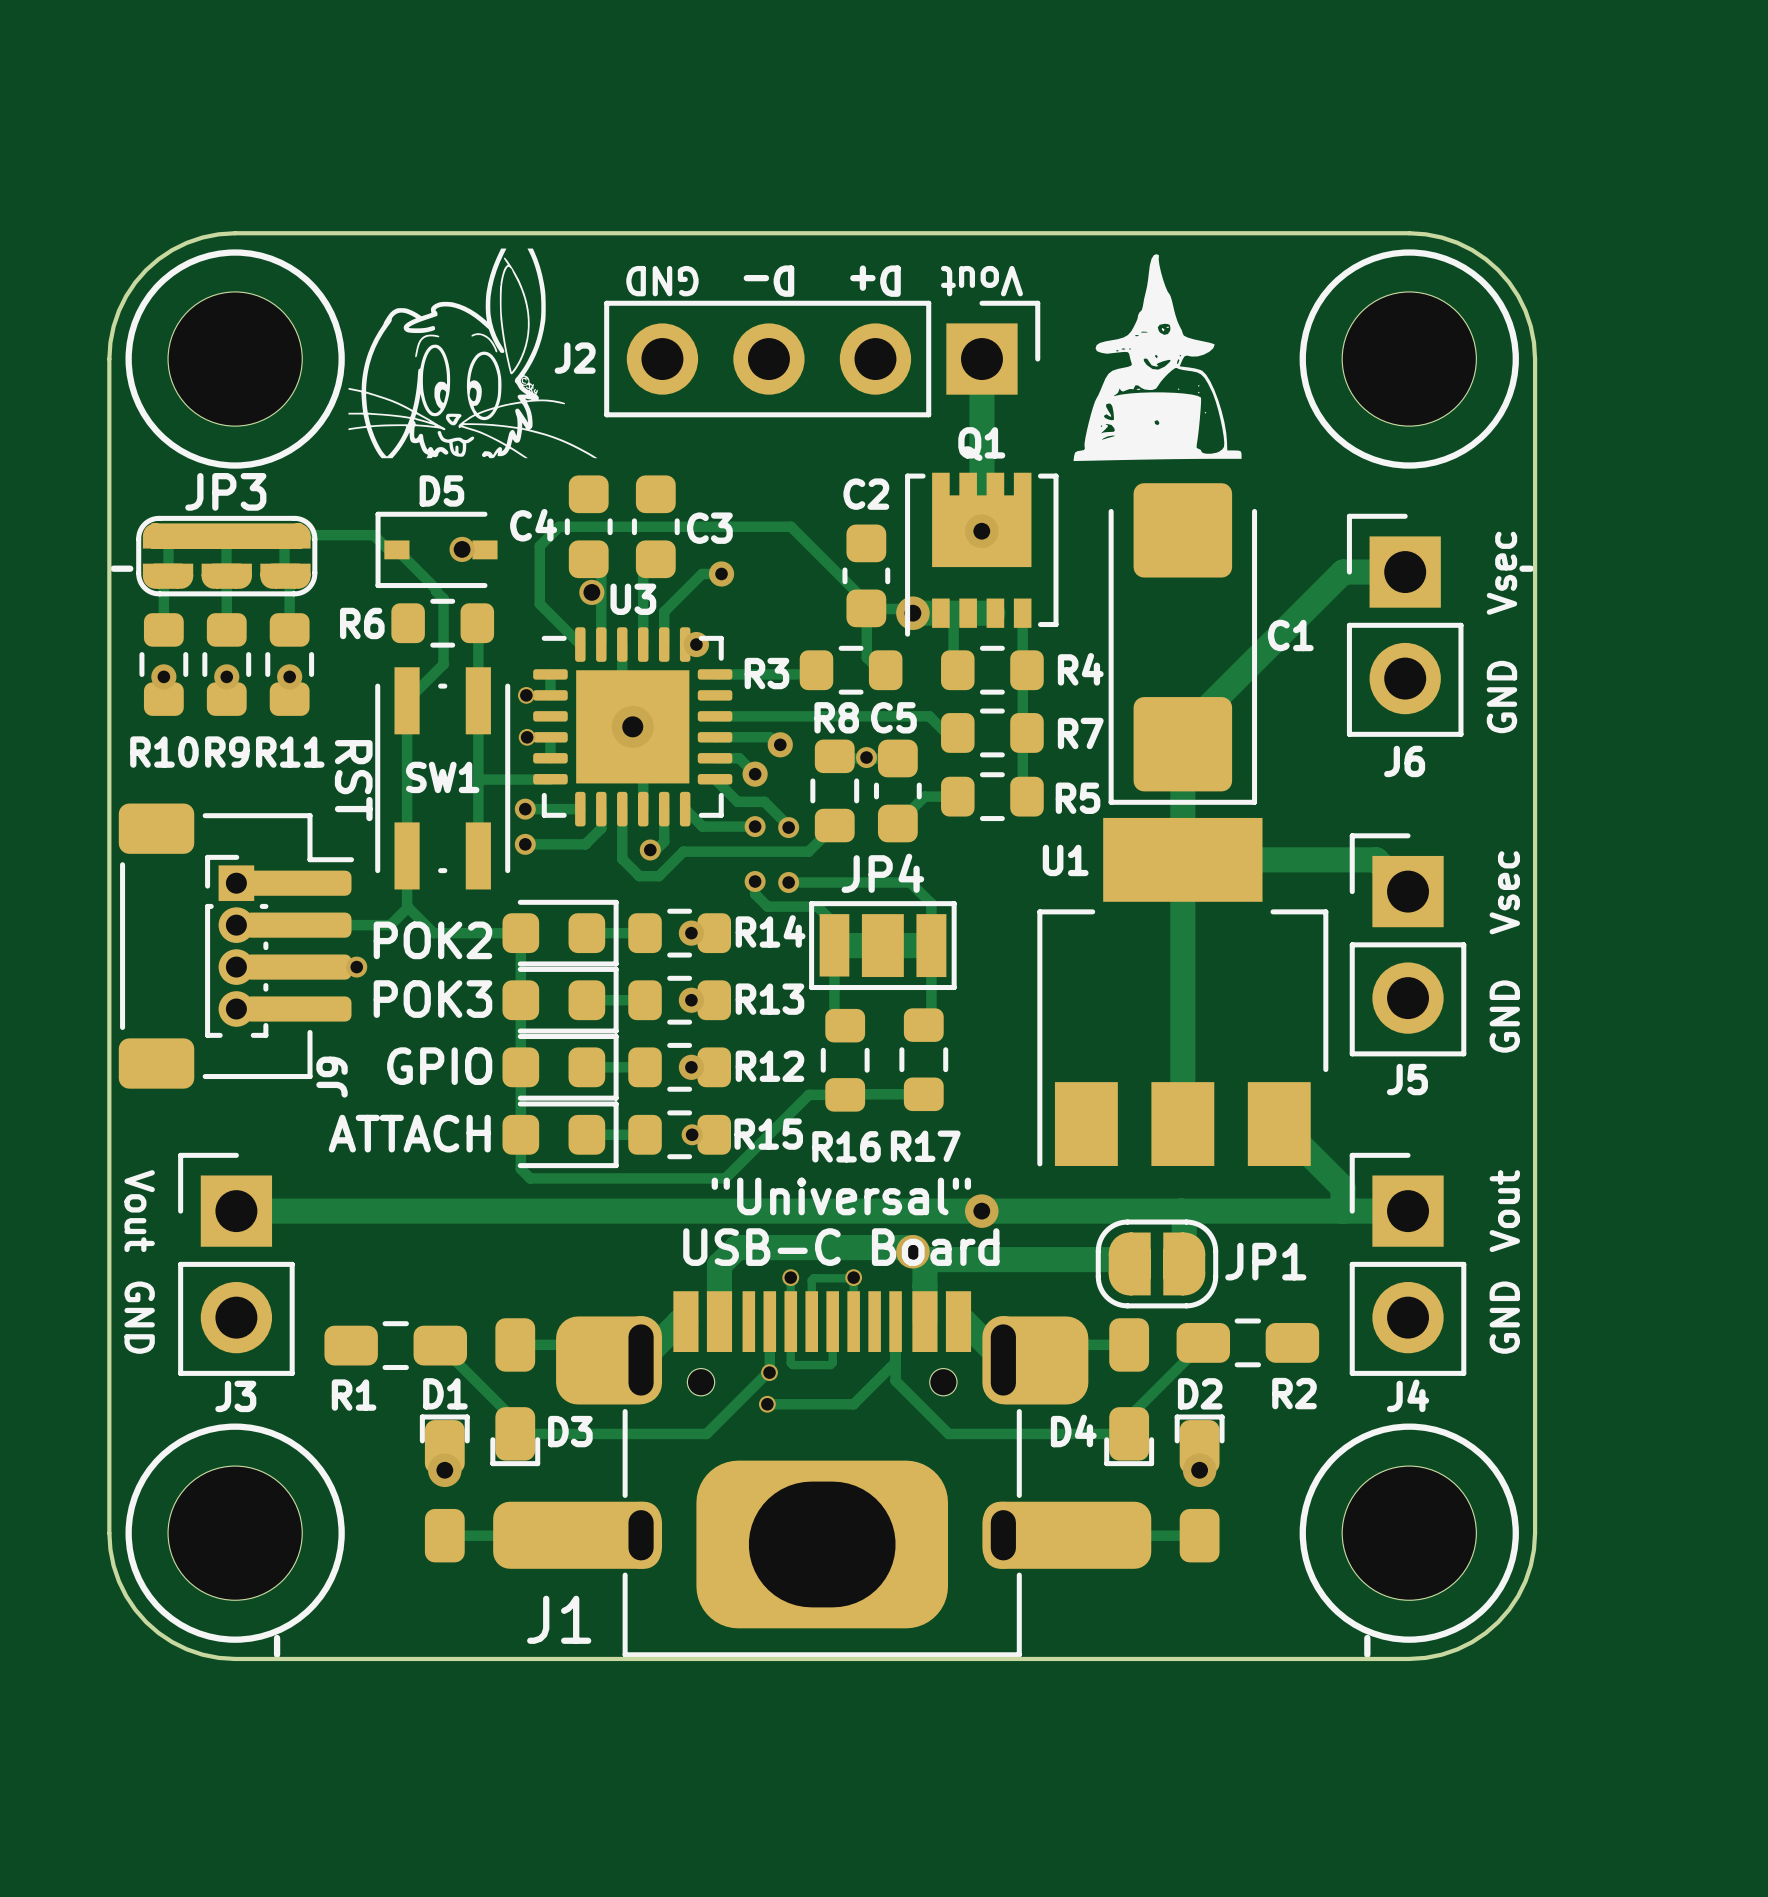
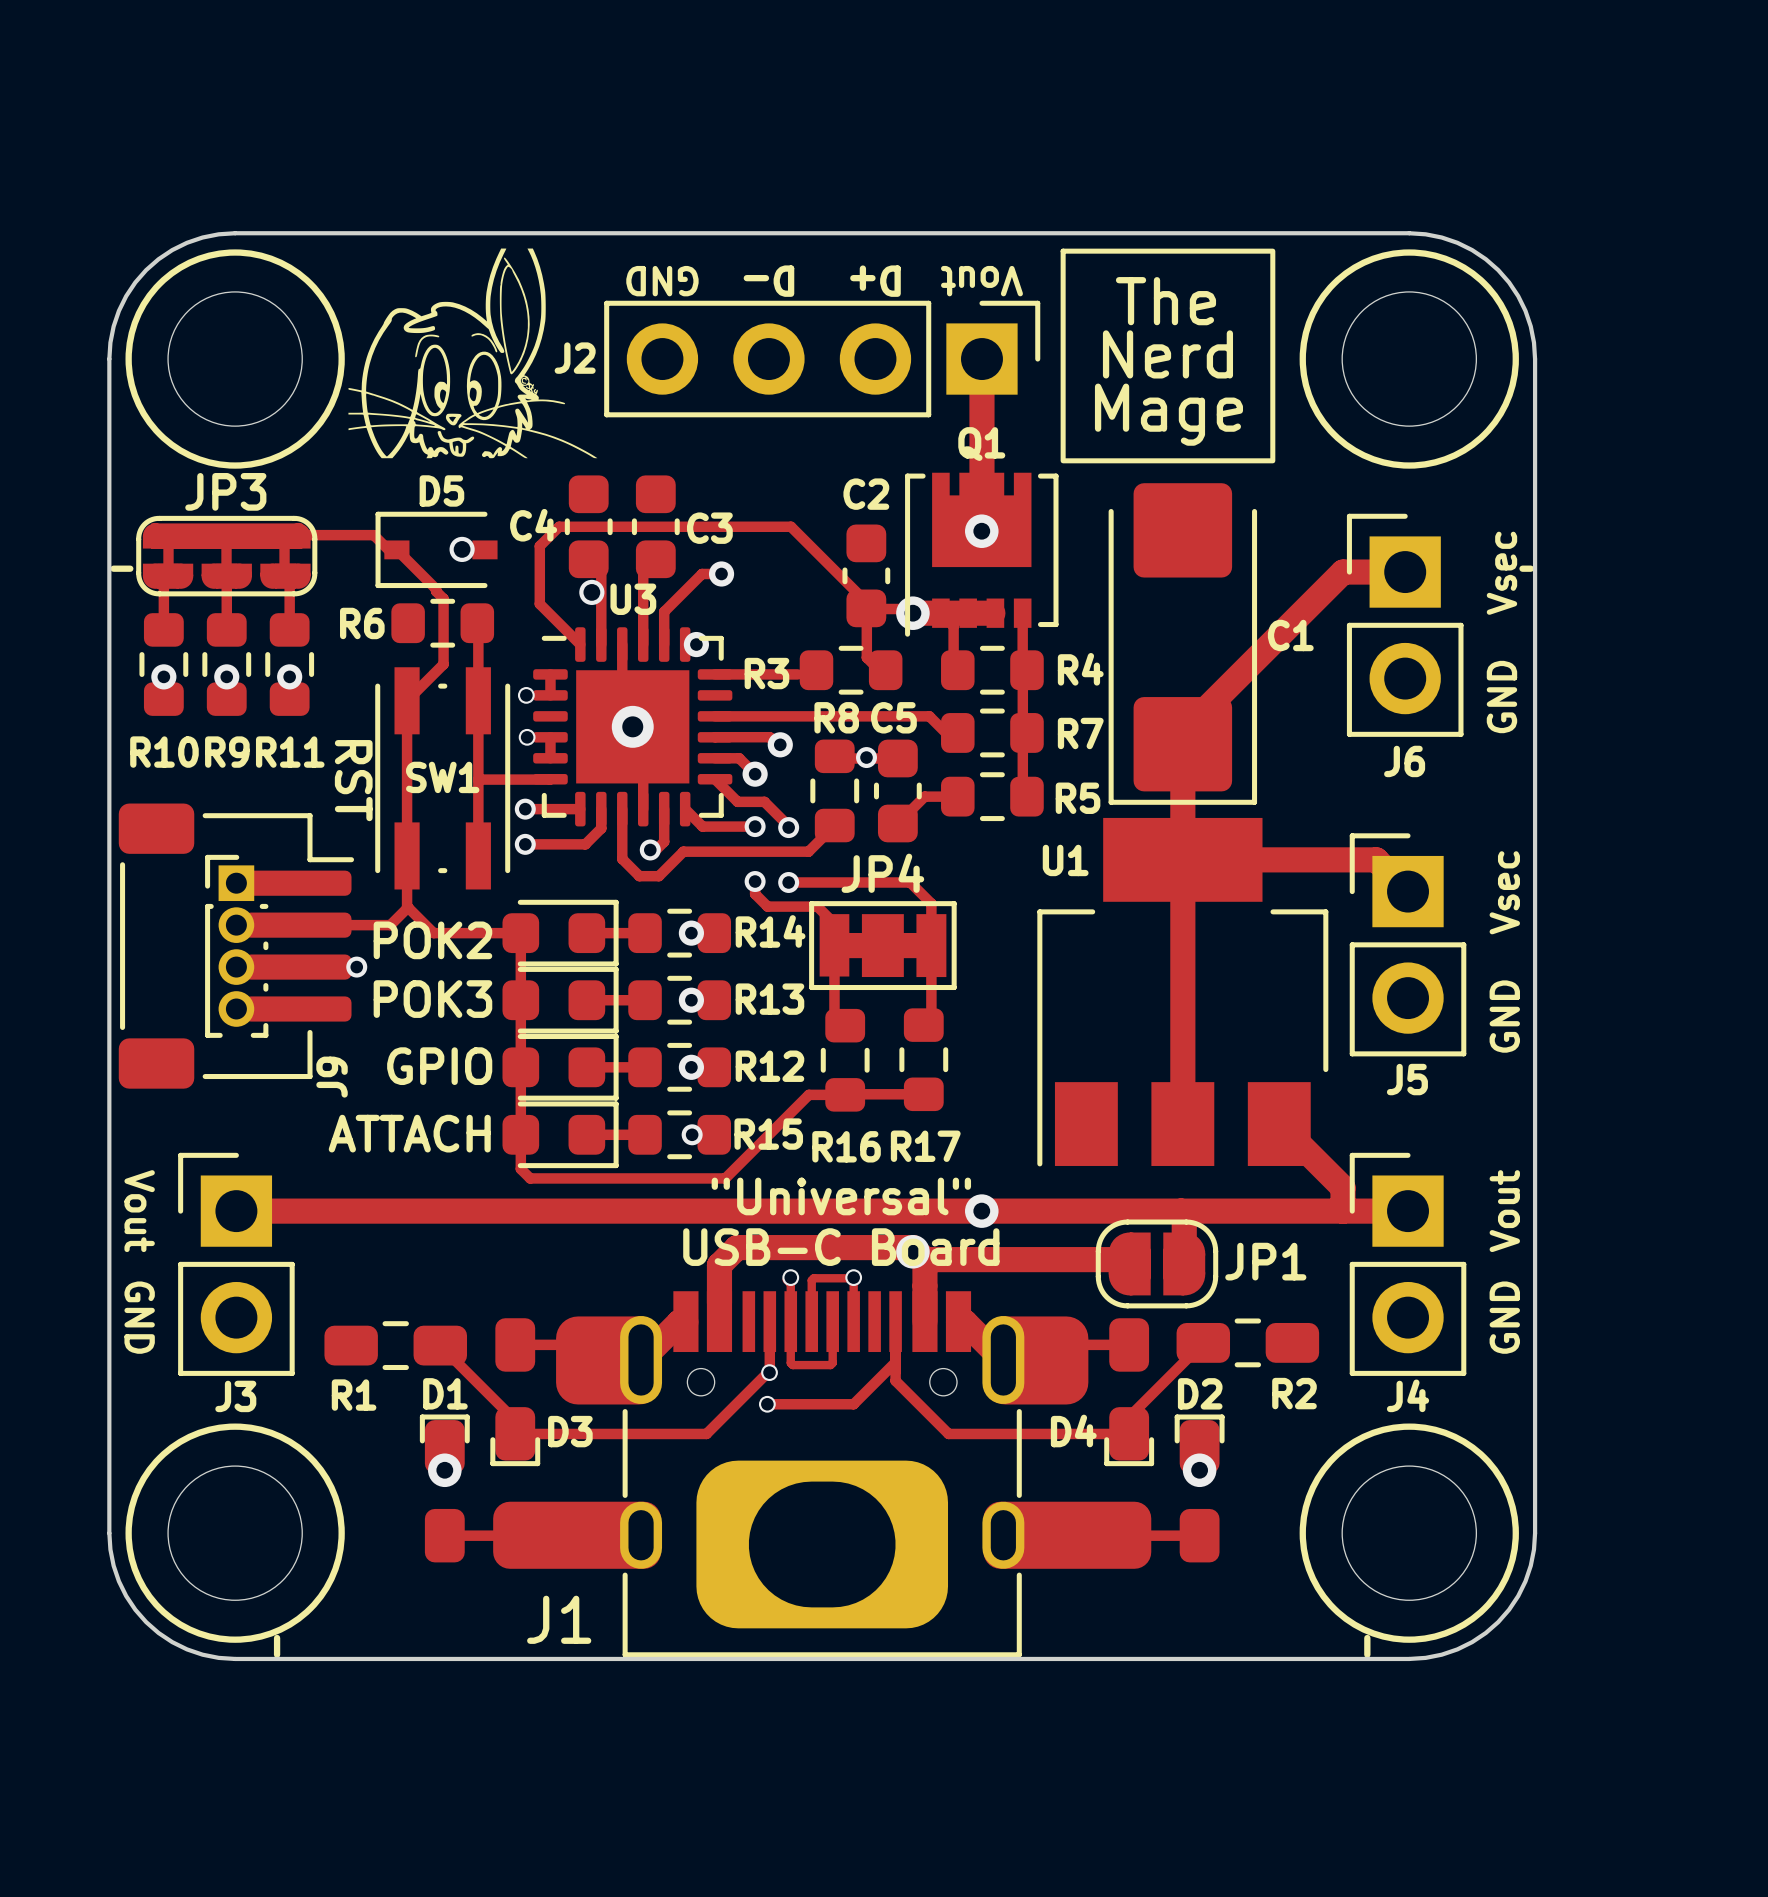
drawing shape: [1073, 254, 1242, 462] -> [1060, 248, 1276, 464]

